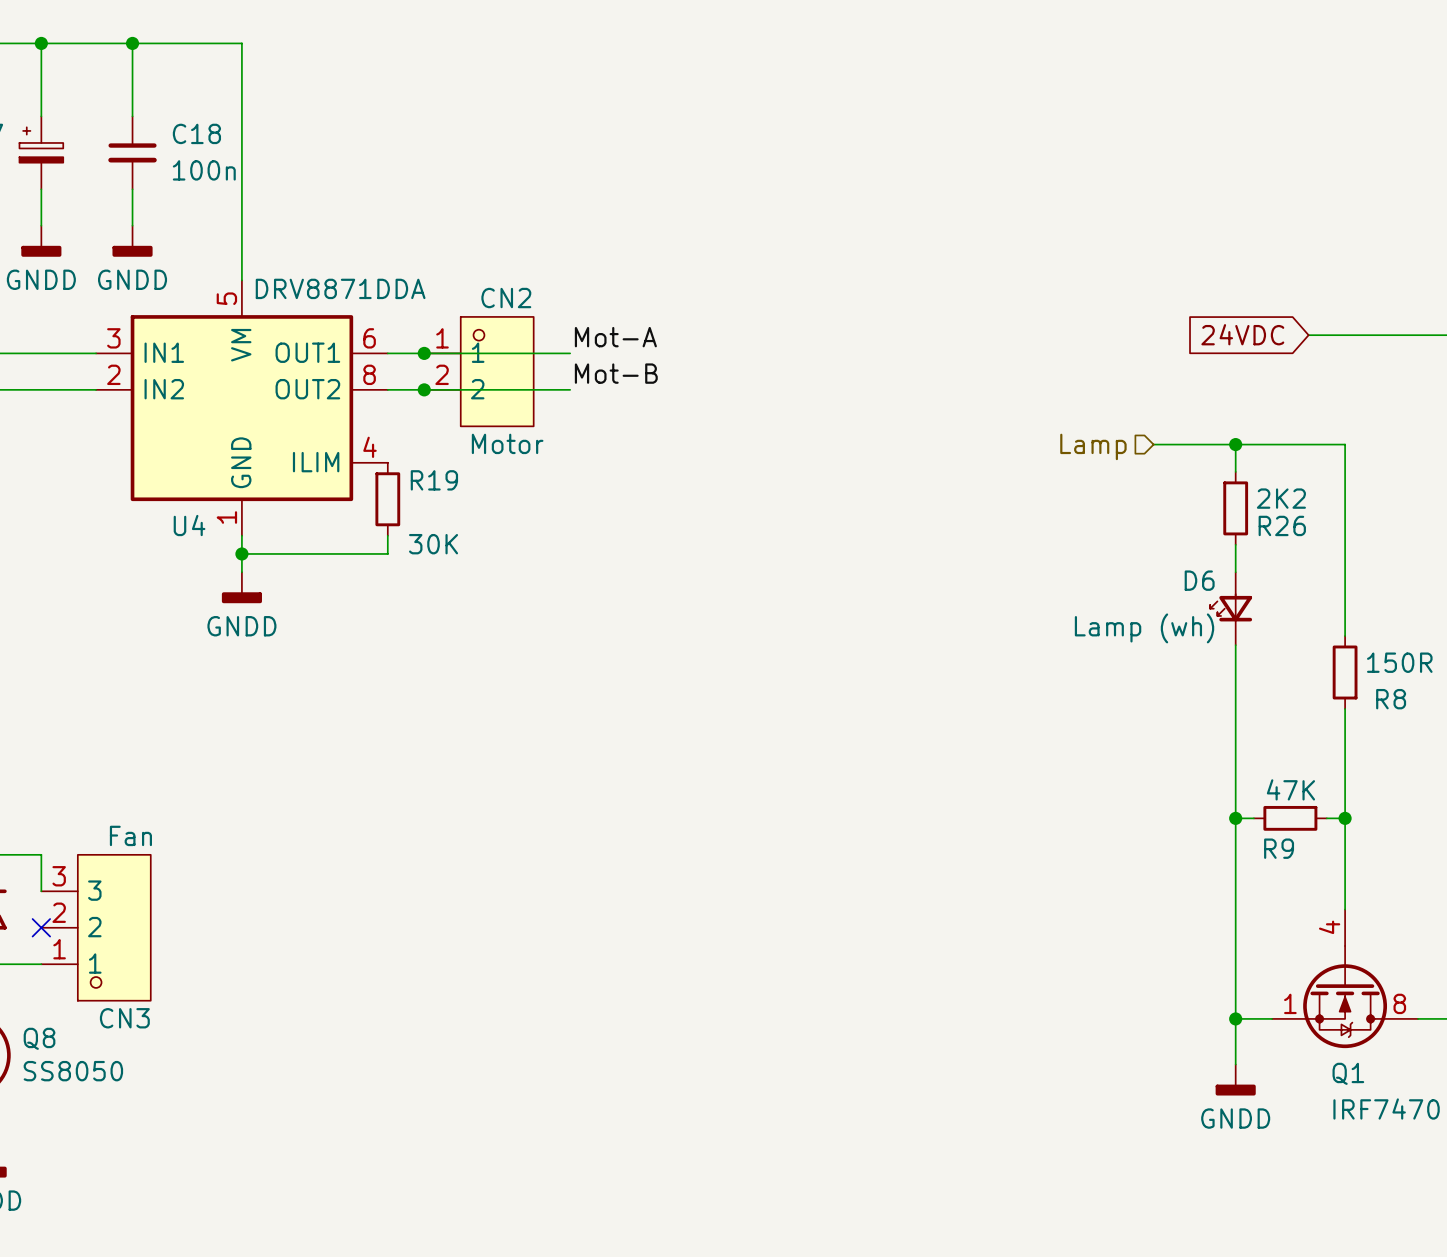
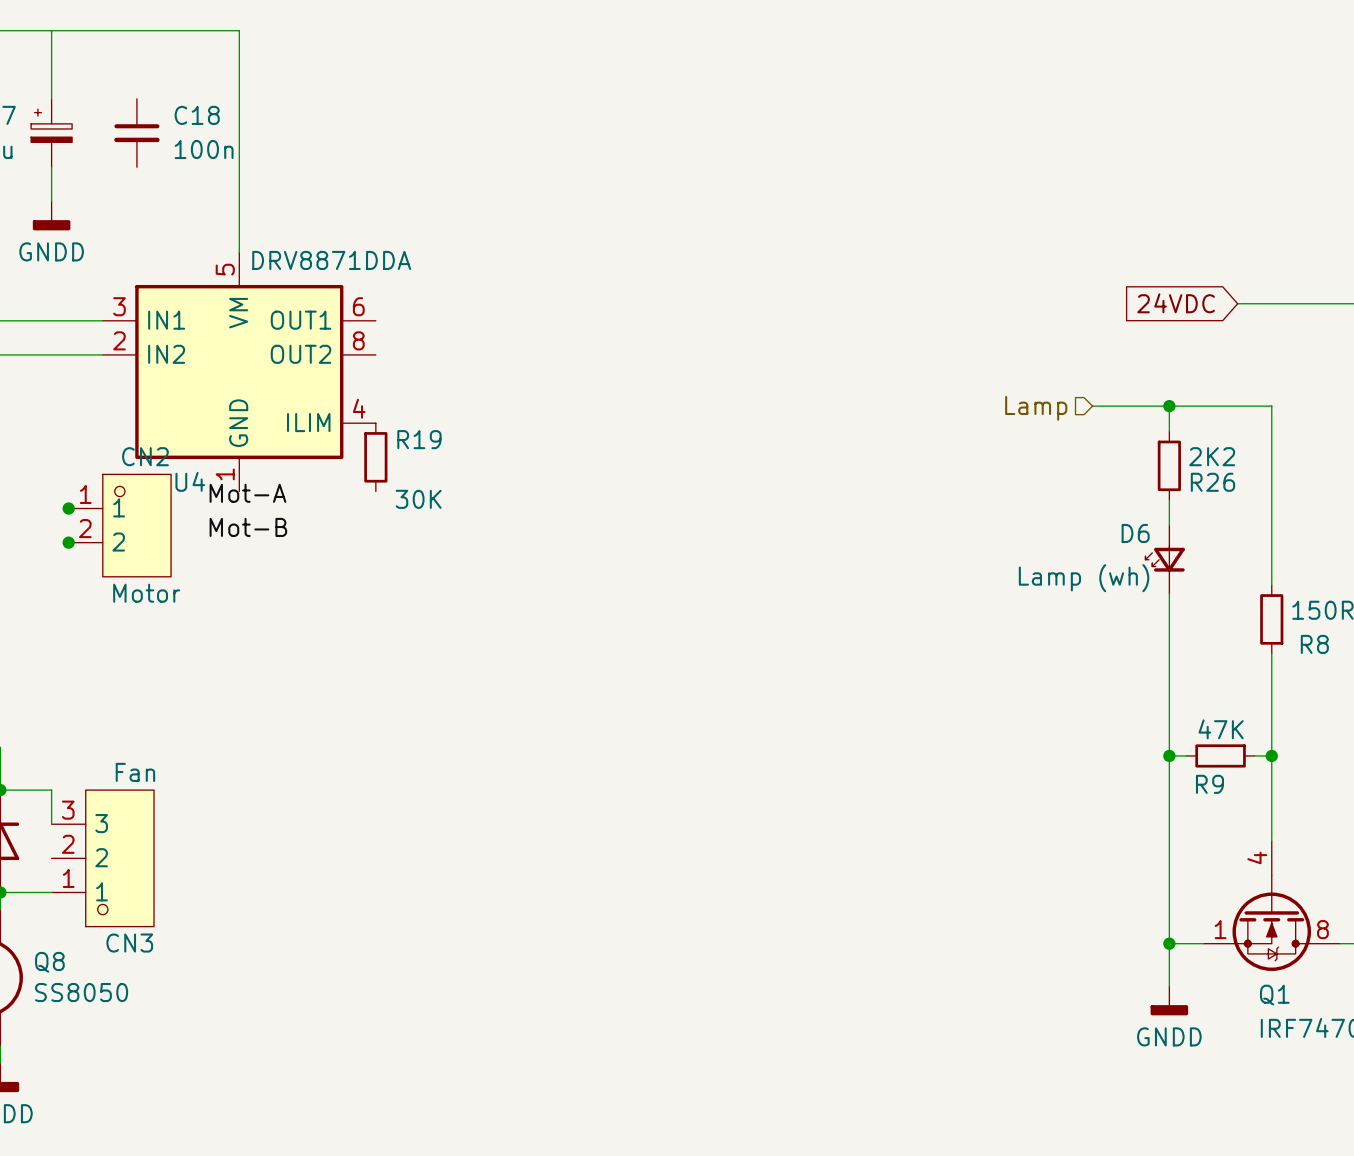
junction: (41, 43) -> none
wire: (132, 43) (132, 116) -> none
junction: (132, 43) -> none
wire: (132, 189) (132, 225) -> none
power symbol: GNDD (132, 241) -> none
label: Mot-A (615, 337) -> none
wire: (387, 353) (570, 353) -> none
junction: (424, 353) -> none
CN2 position: (478, 371) -> (119, 525)
label: Mot-B (616, 373) -> none
wire: (387, 389) (570, 389) -> none
junction: (424, 389) -> none
wire: (241, 535) (241, 572) -> none
wire: (387, 535) (387, 553) (241, 553) -> none
label: none -> Mot-A (247, 493)
junction: none -> (68, 508)
junction: (241, 553) -> none
label: none -> Mot-B (248, 527)
power symbol: GNDD (241, 587) -> none
junction: none -> (68, 542)
no-connect mark: (41, 927) -> none

